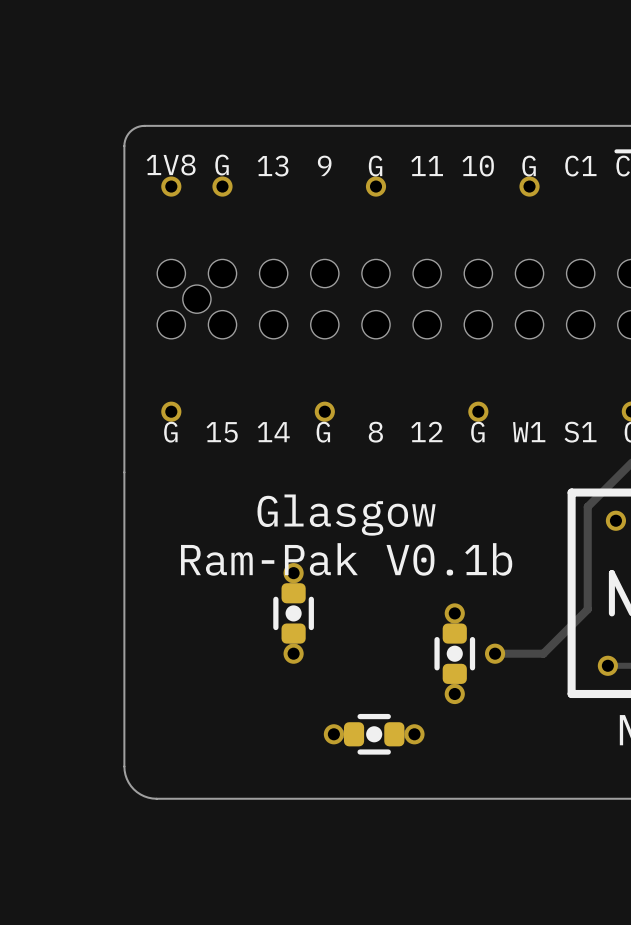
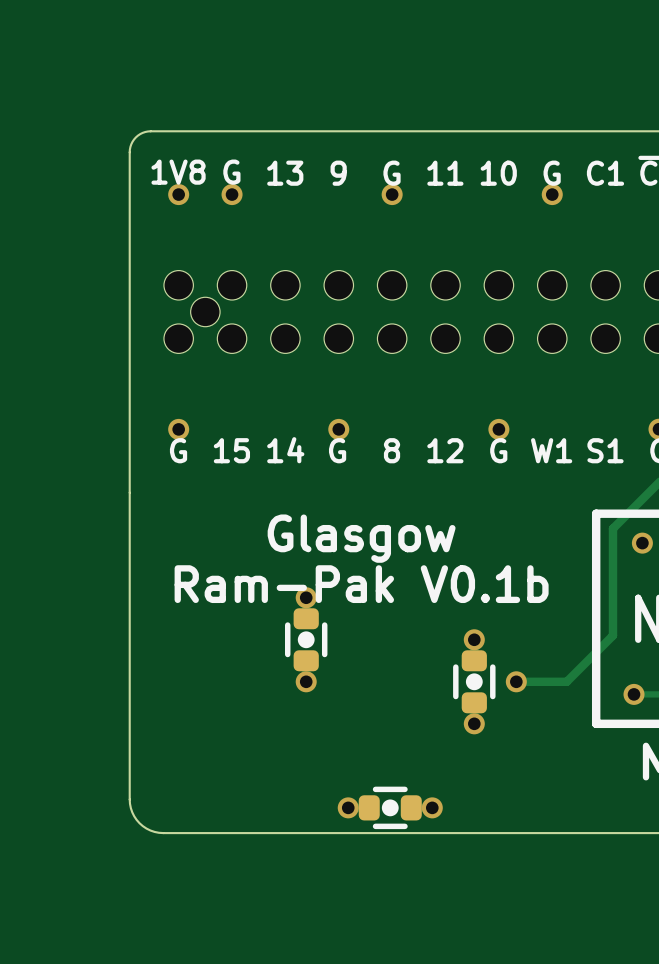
via position: (333, 734) -> (348, 807)
part position: (374, 734) -> (390, 807)
via position: (414, 734) -> (432, 807)

